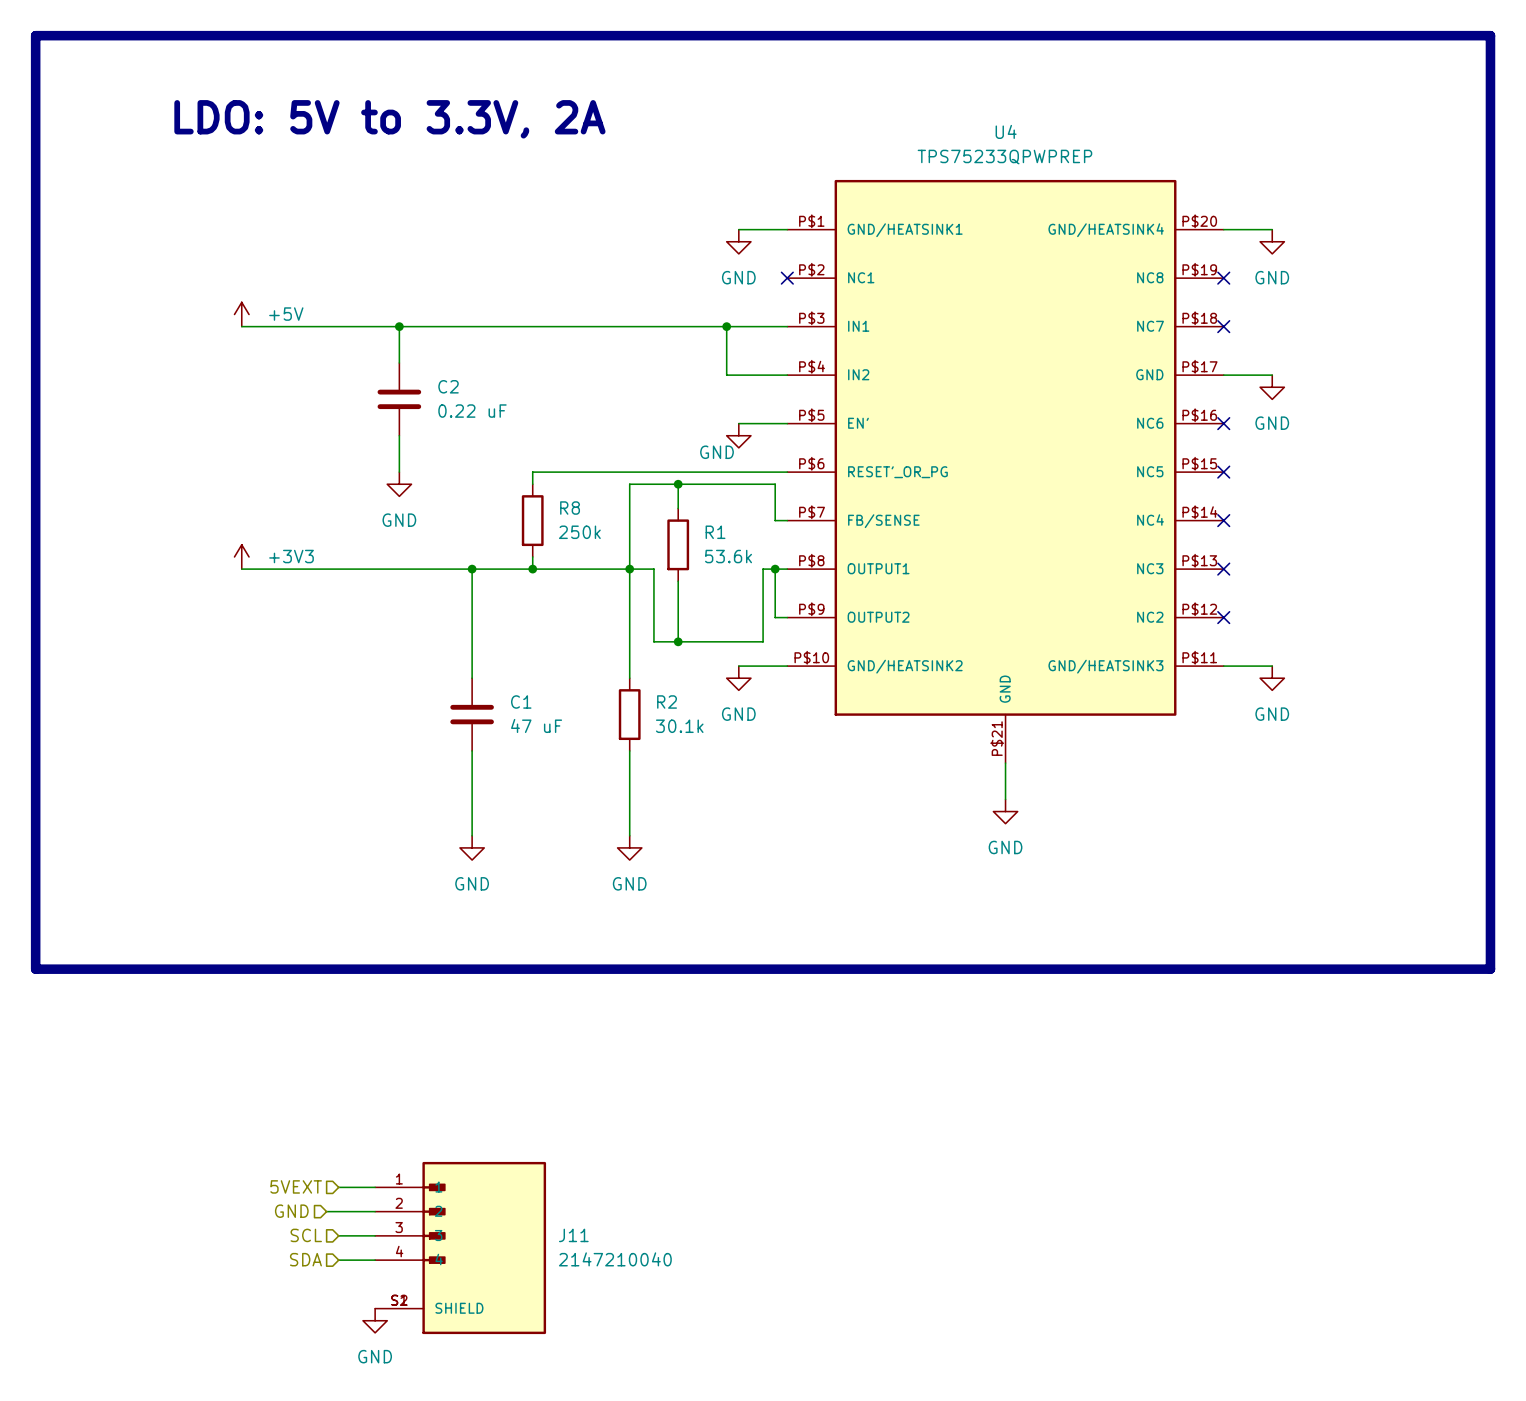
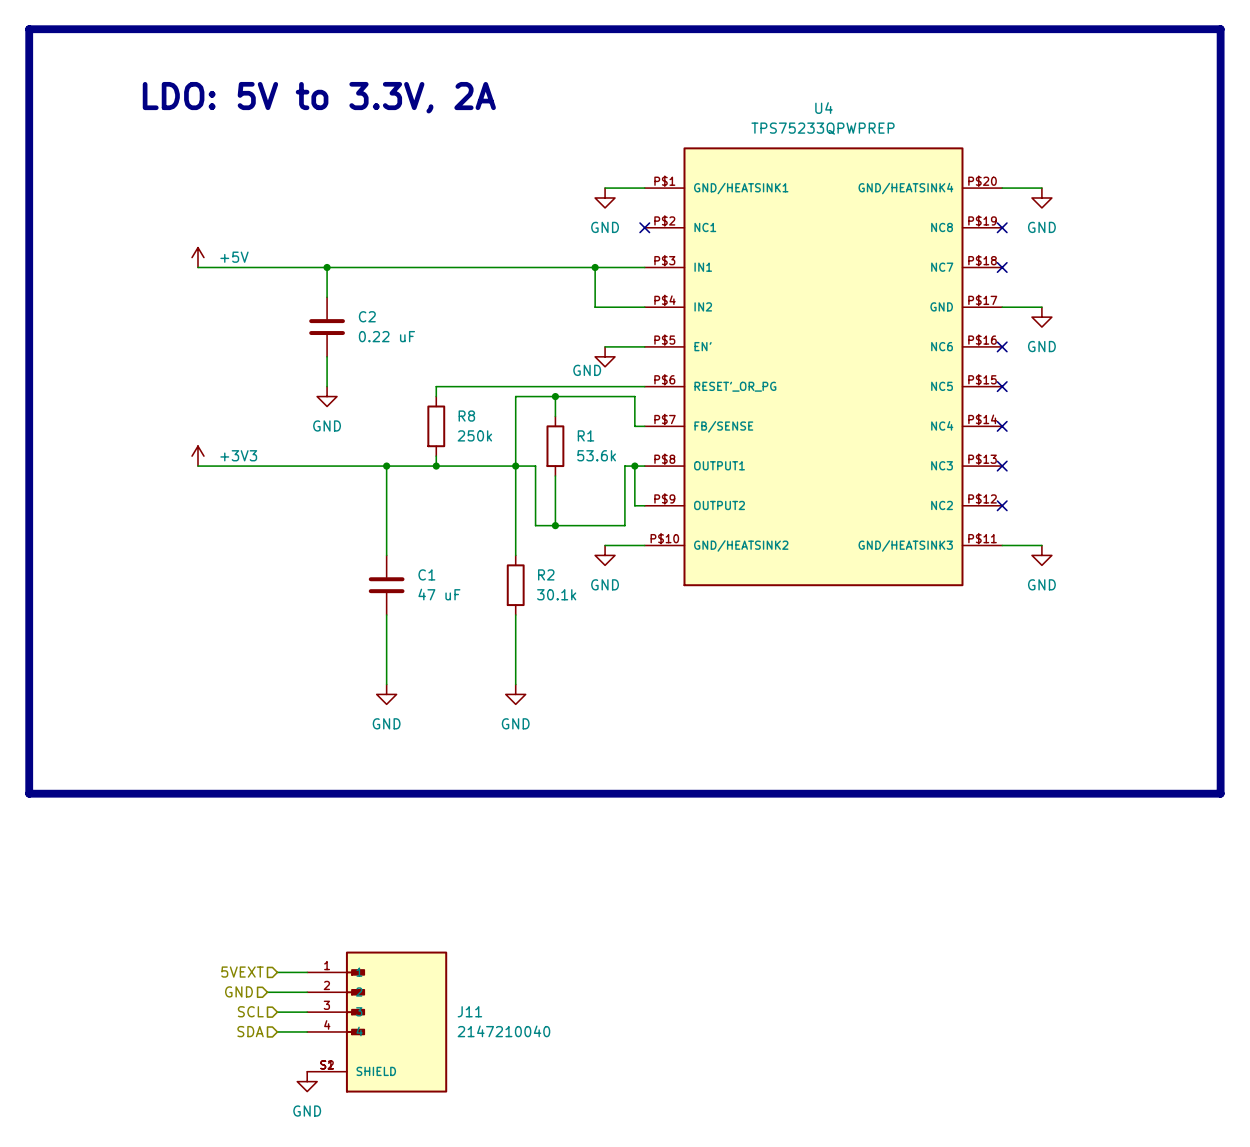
U4 symbol: [787, 179, 1224, 764] -> [644, 147, 1003, 587]
wire: (1005, 763) (1005, 799) -> none
power symbol: GND (1005, 811) -> none

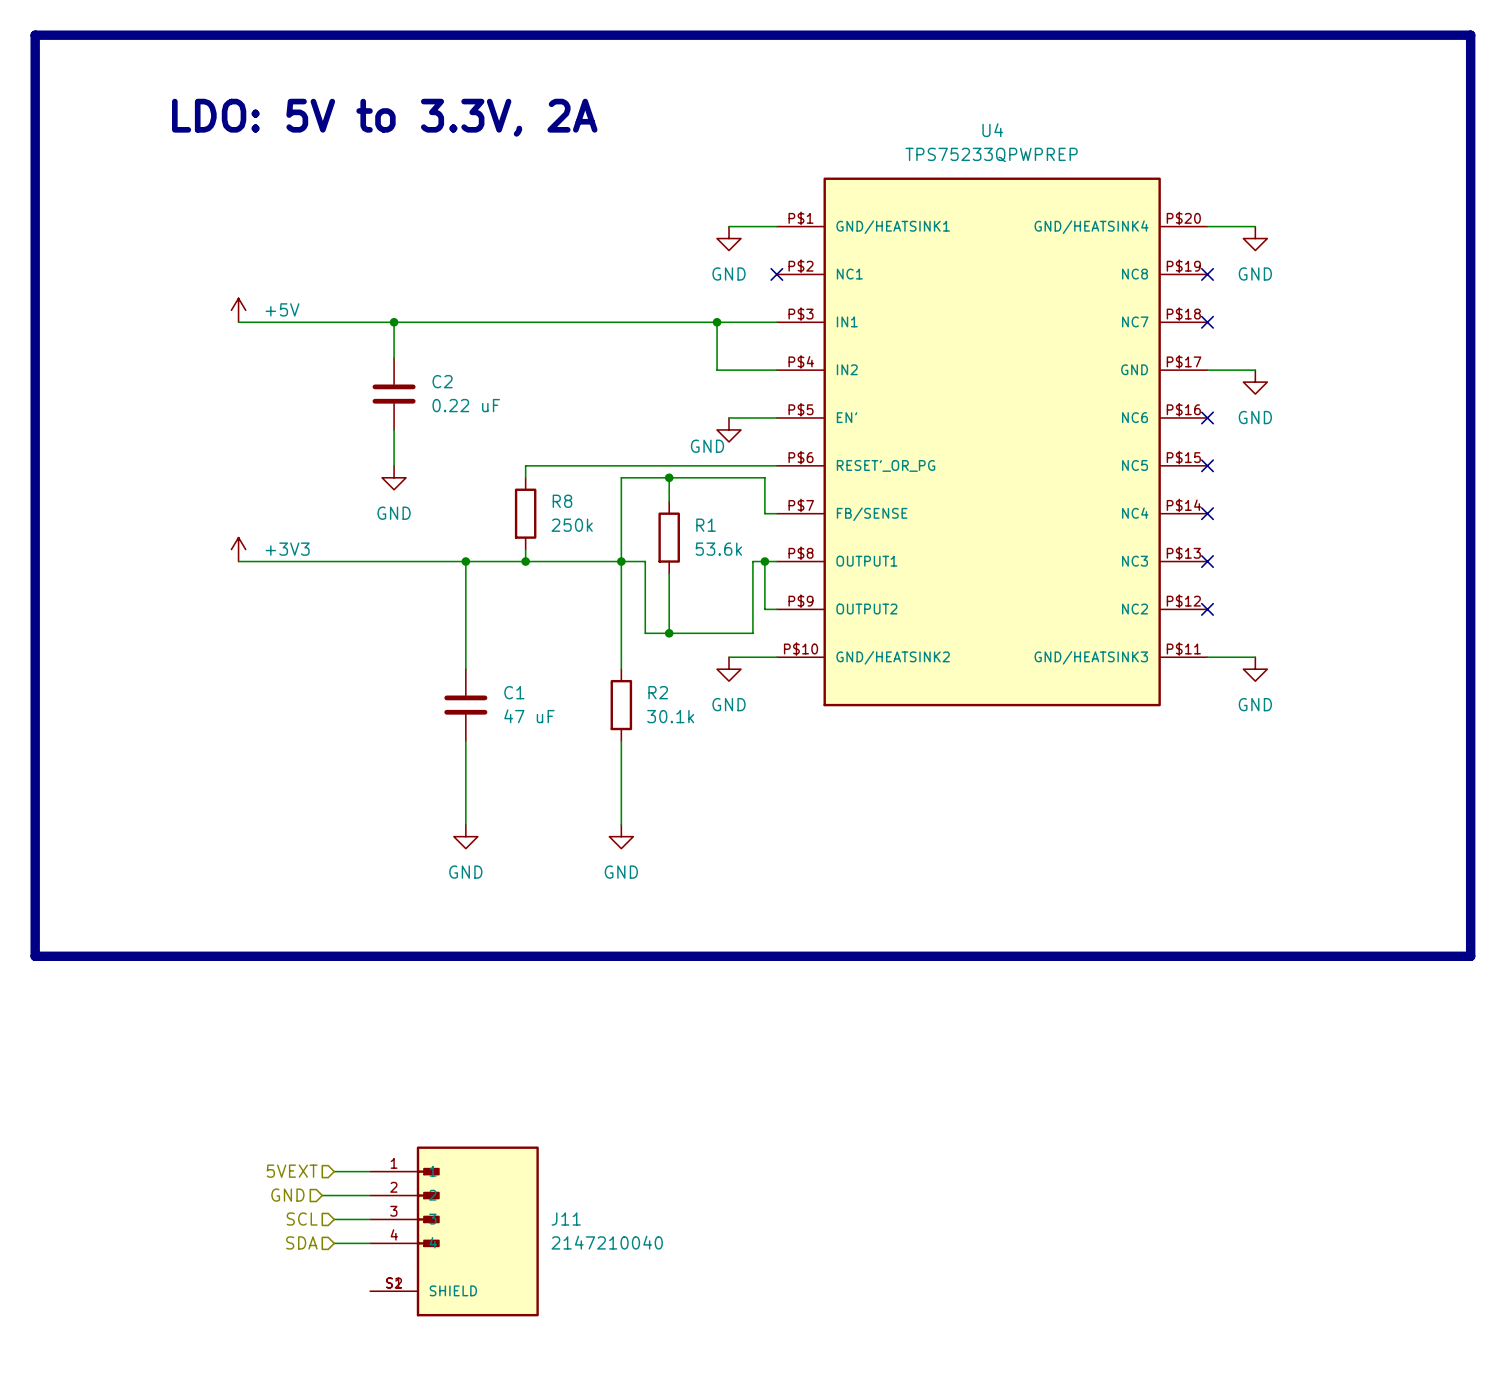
power symbol: GND (307, 1081) -> none

